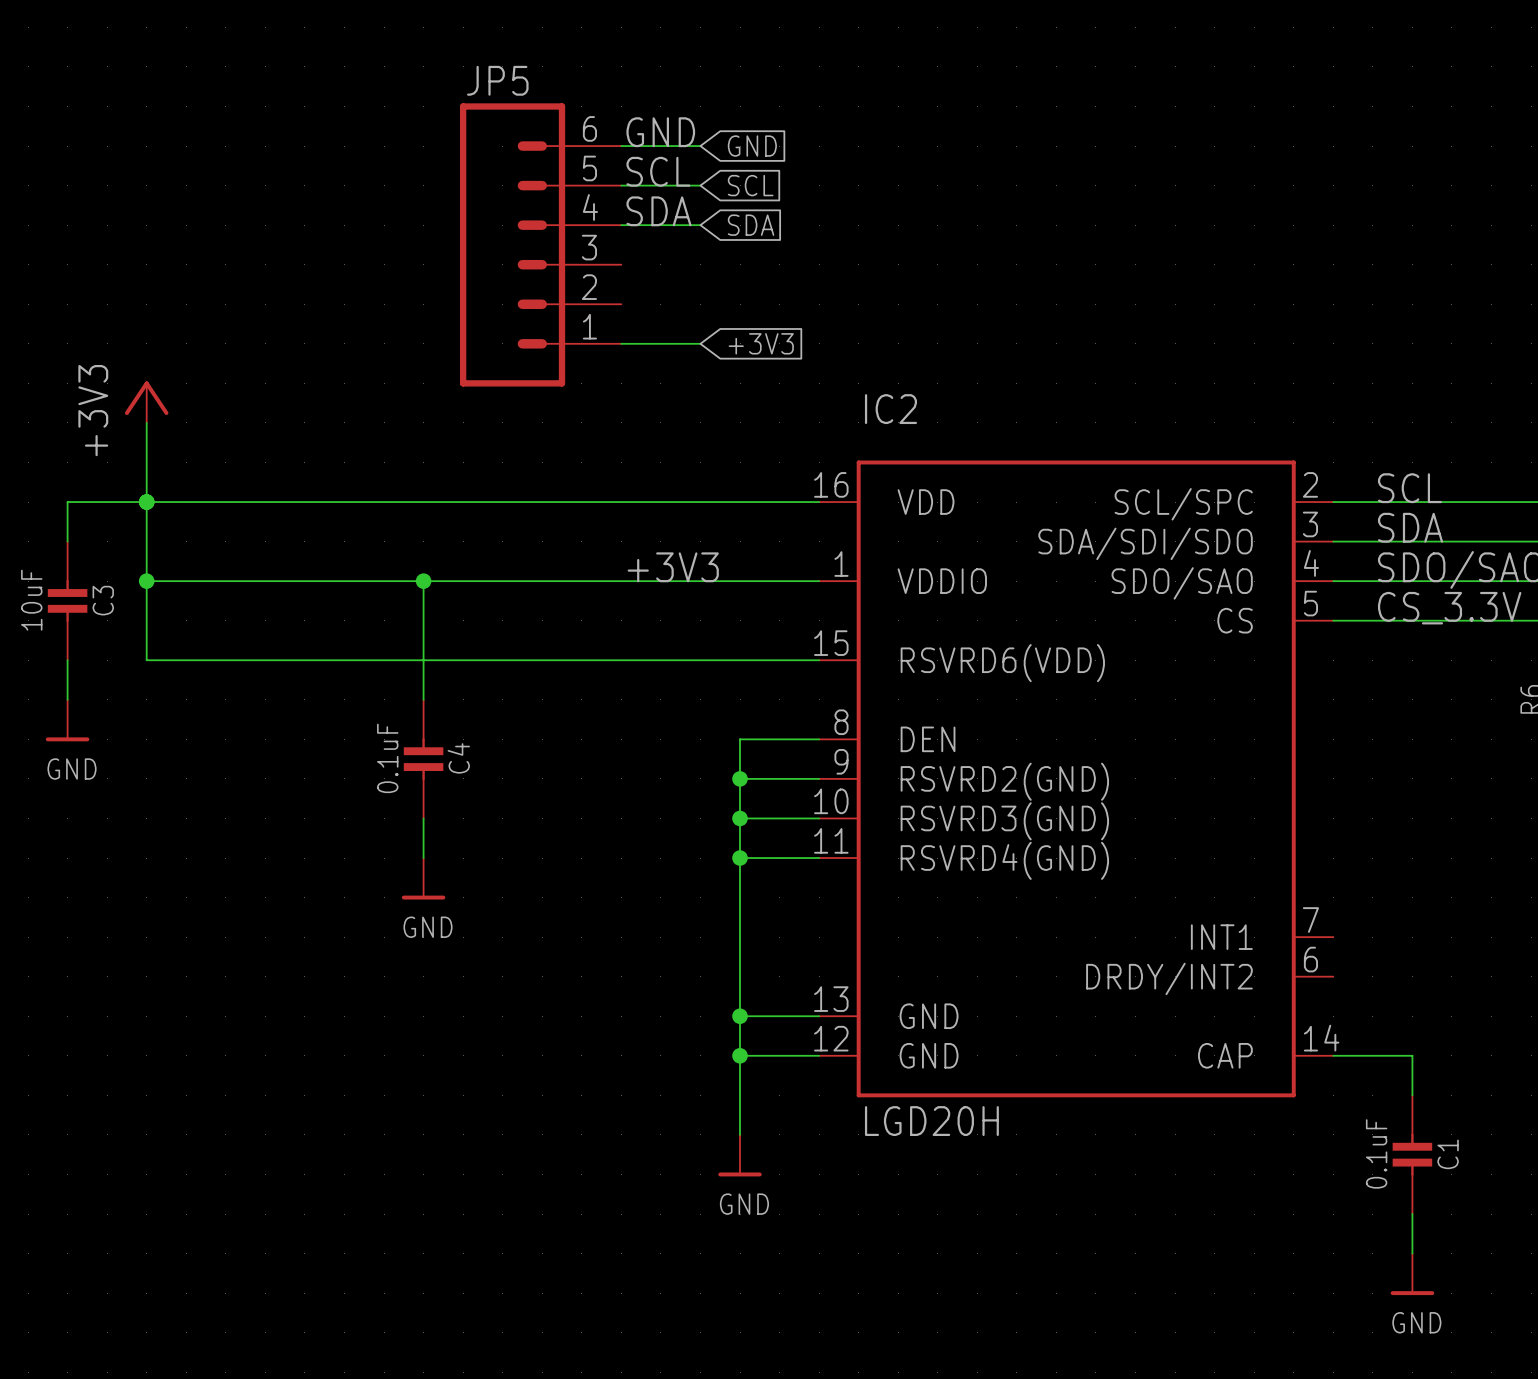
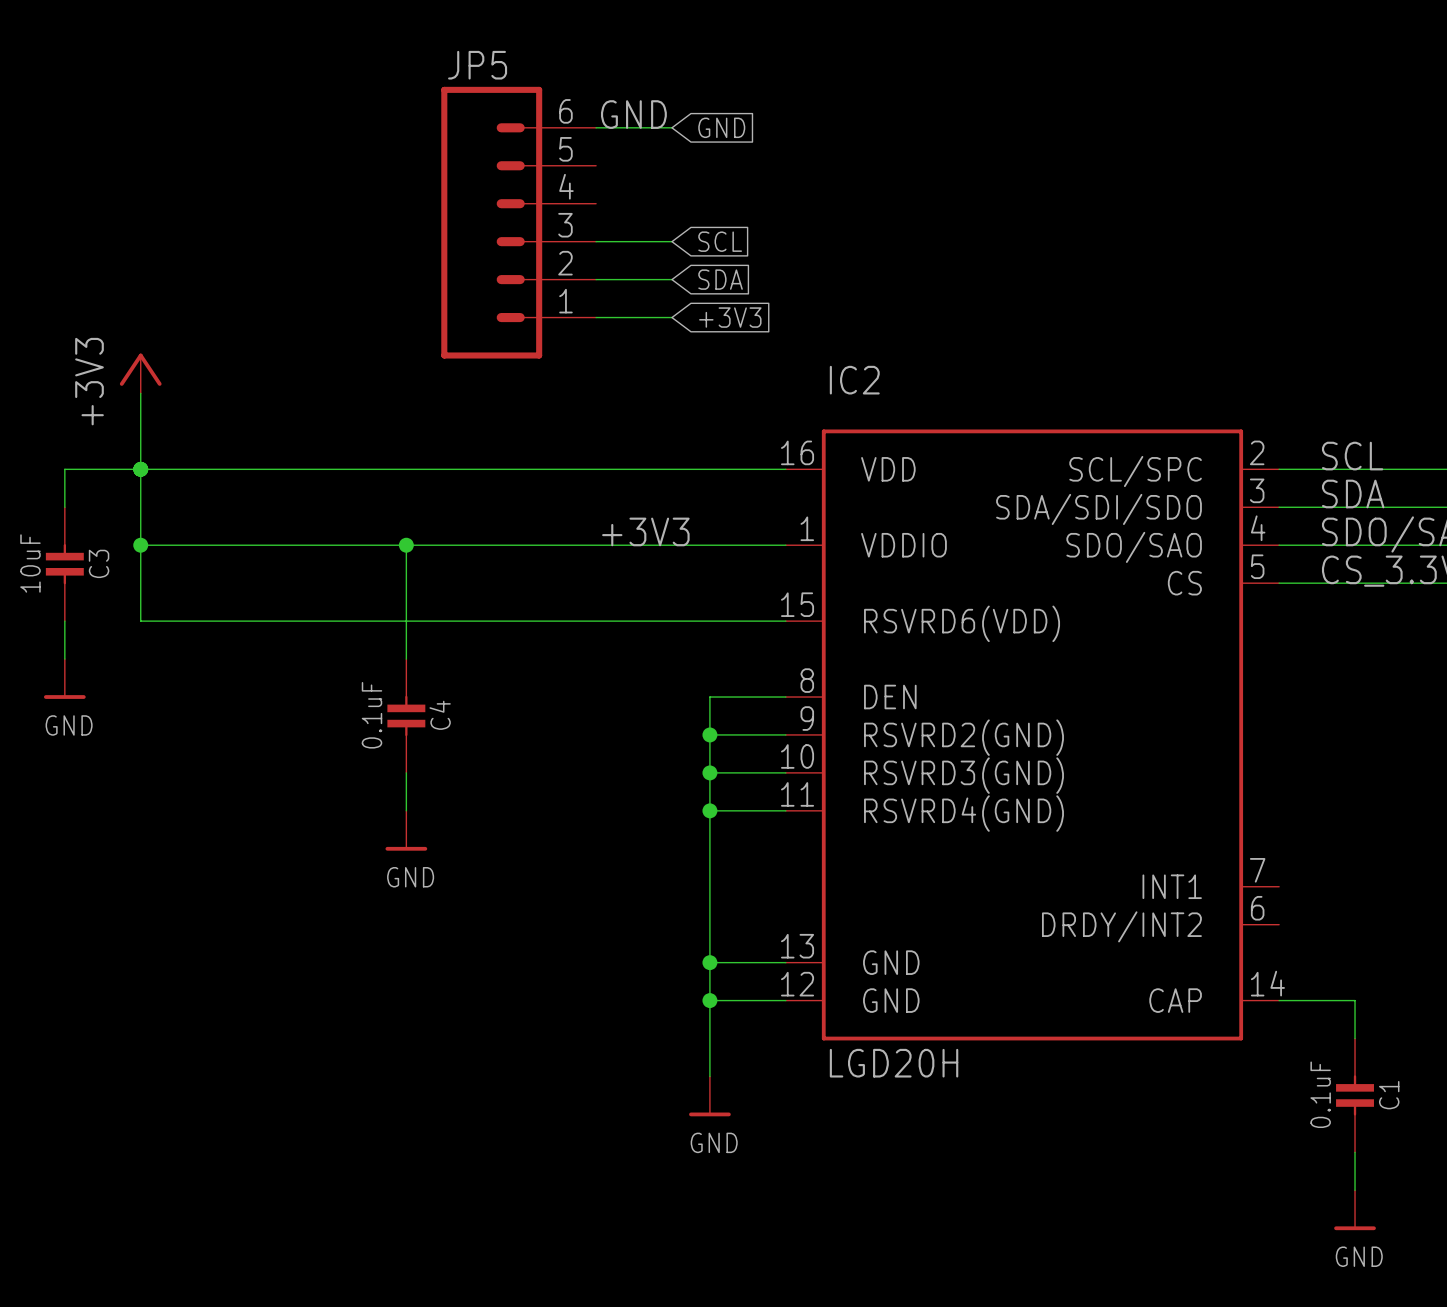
label: SCL (658, 171) -> none
wire: (621, 185) (700, 185) -> (596, 279) (671, 279)
global label position: SCL (750, 185) -> SCL (720, 241)
label: SDA (658, 211) -> none
wire: (621, 225) (700, 225) -> (596, 241) (671, 241)
global label position: SDA (751, 225) -> SDA (720, 279)

